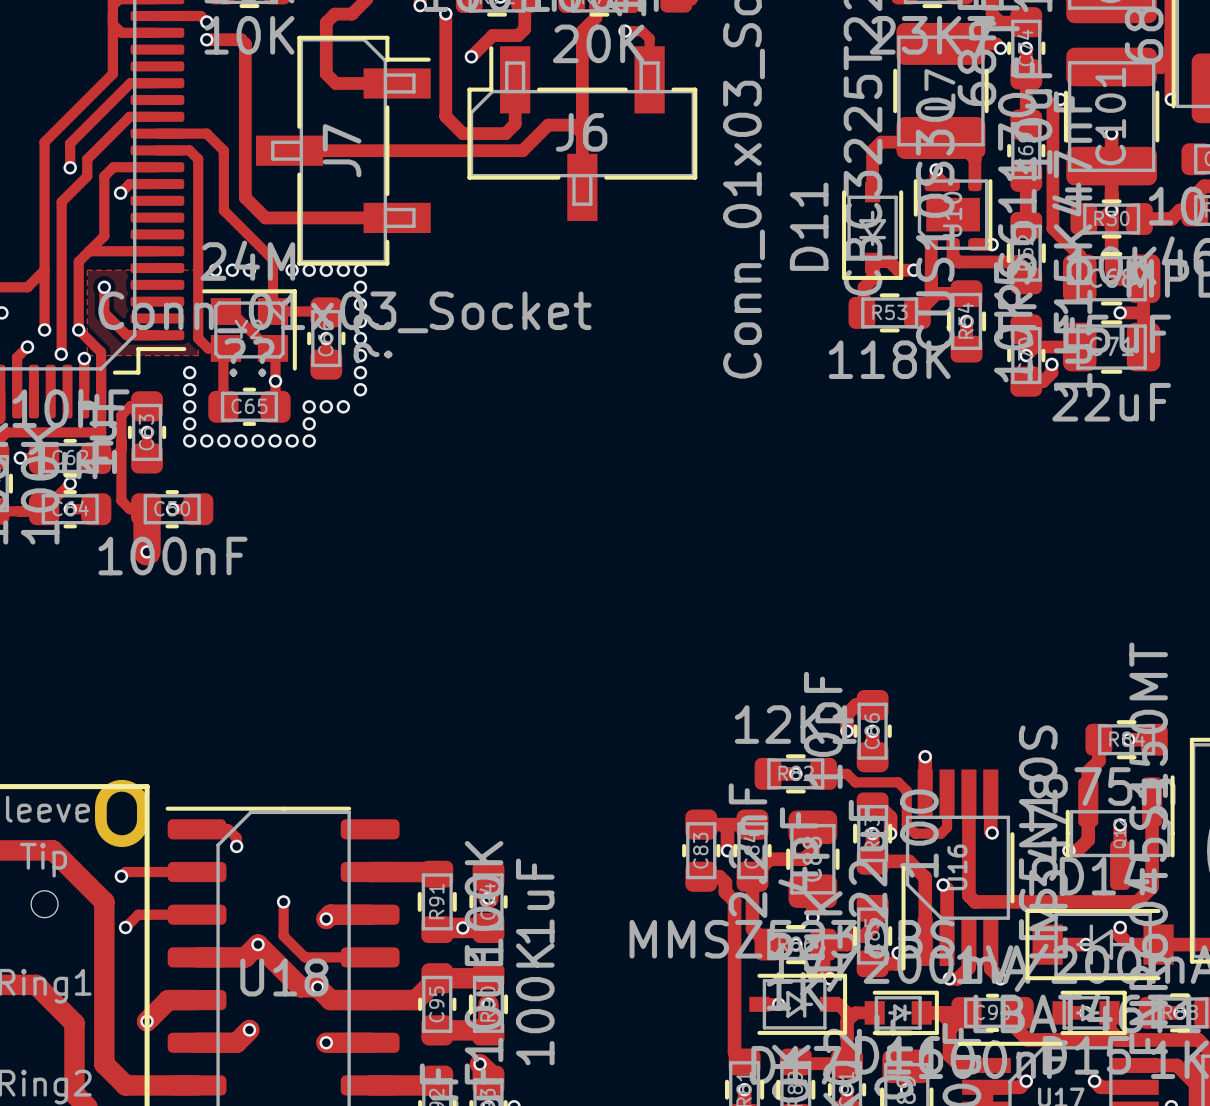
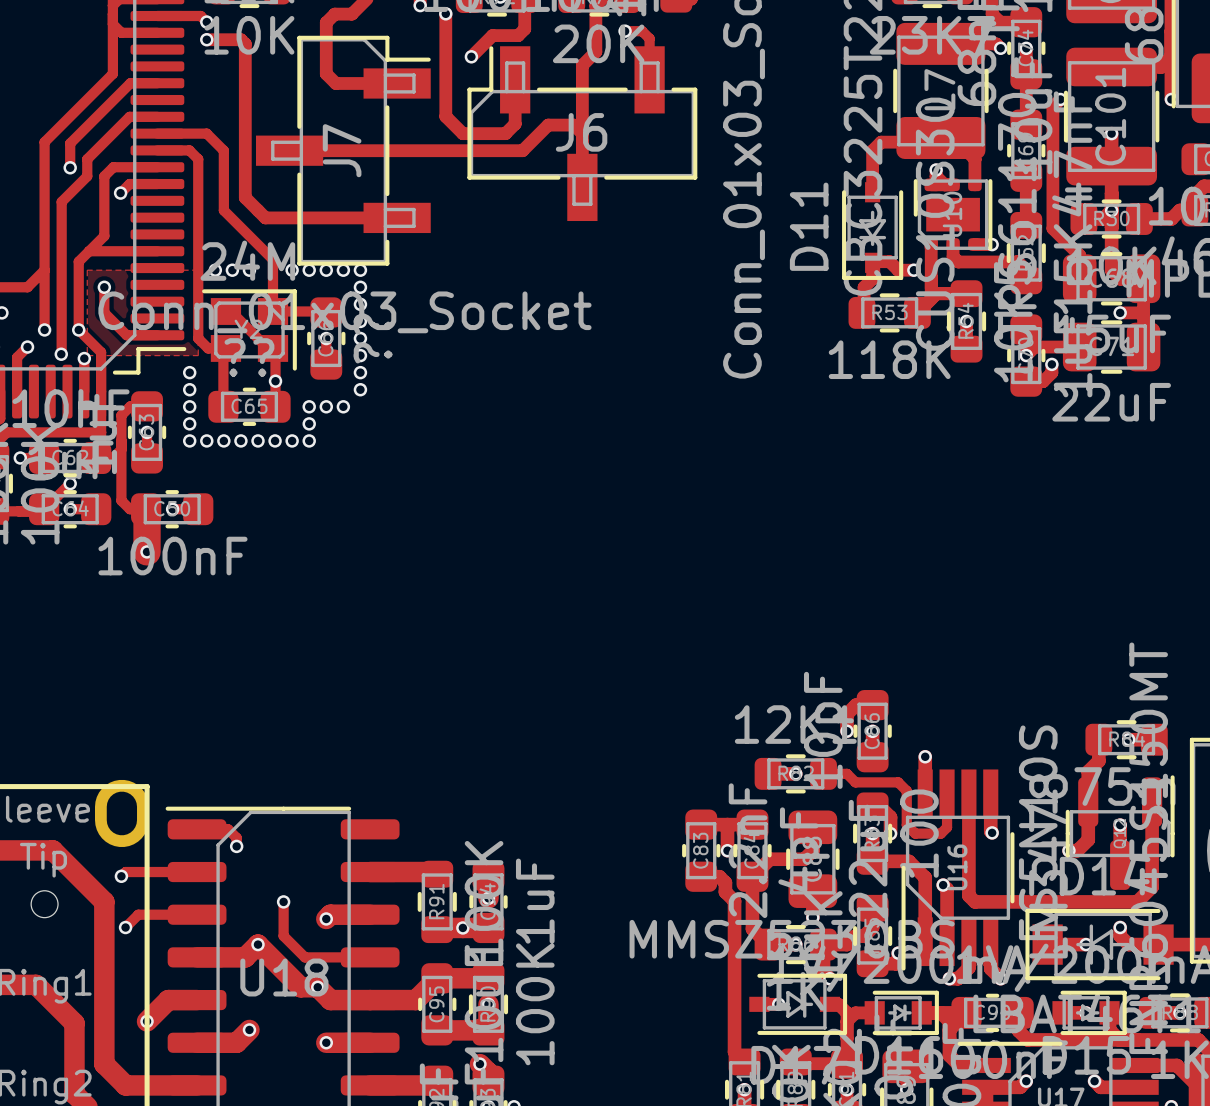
track: (595, 17) (582, 31) (582, 65) -> (595, 17) (595, 51) (582, 65)

